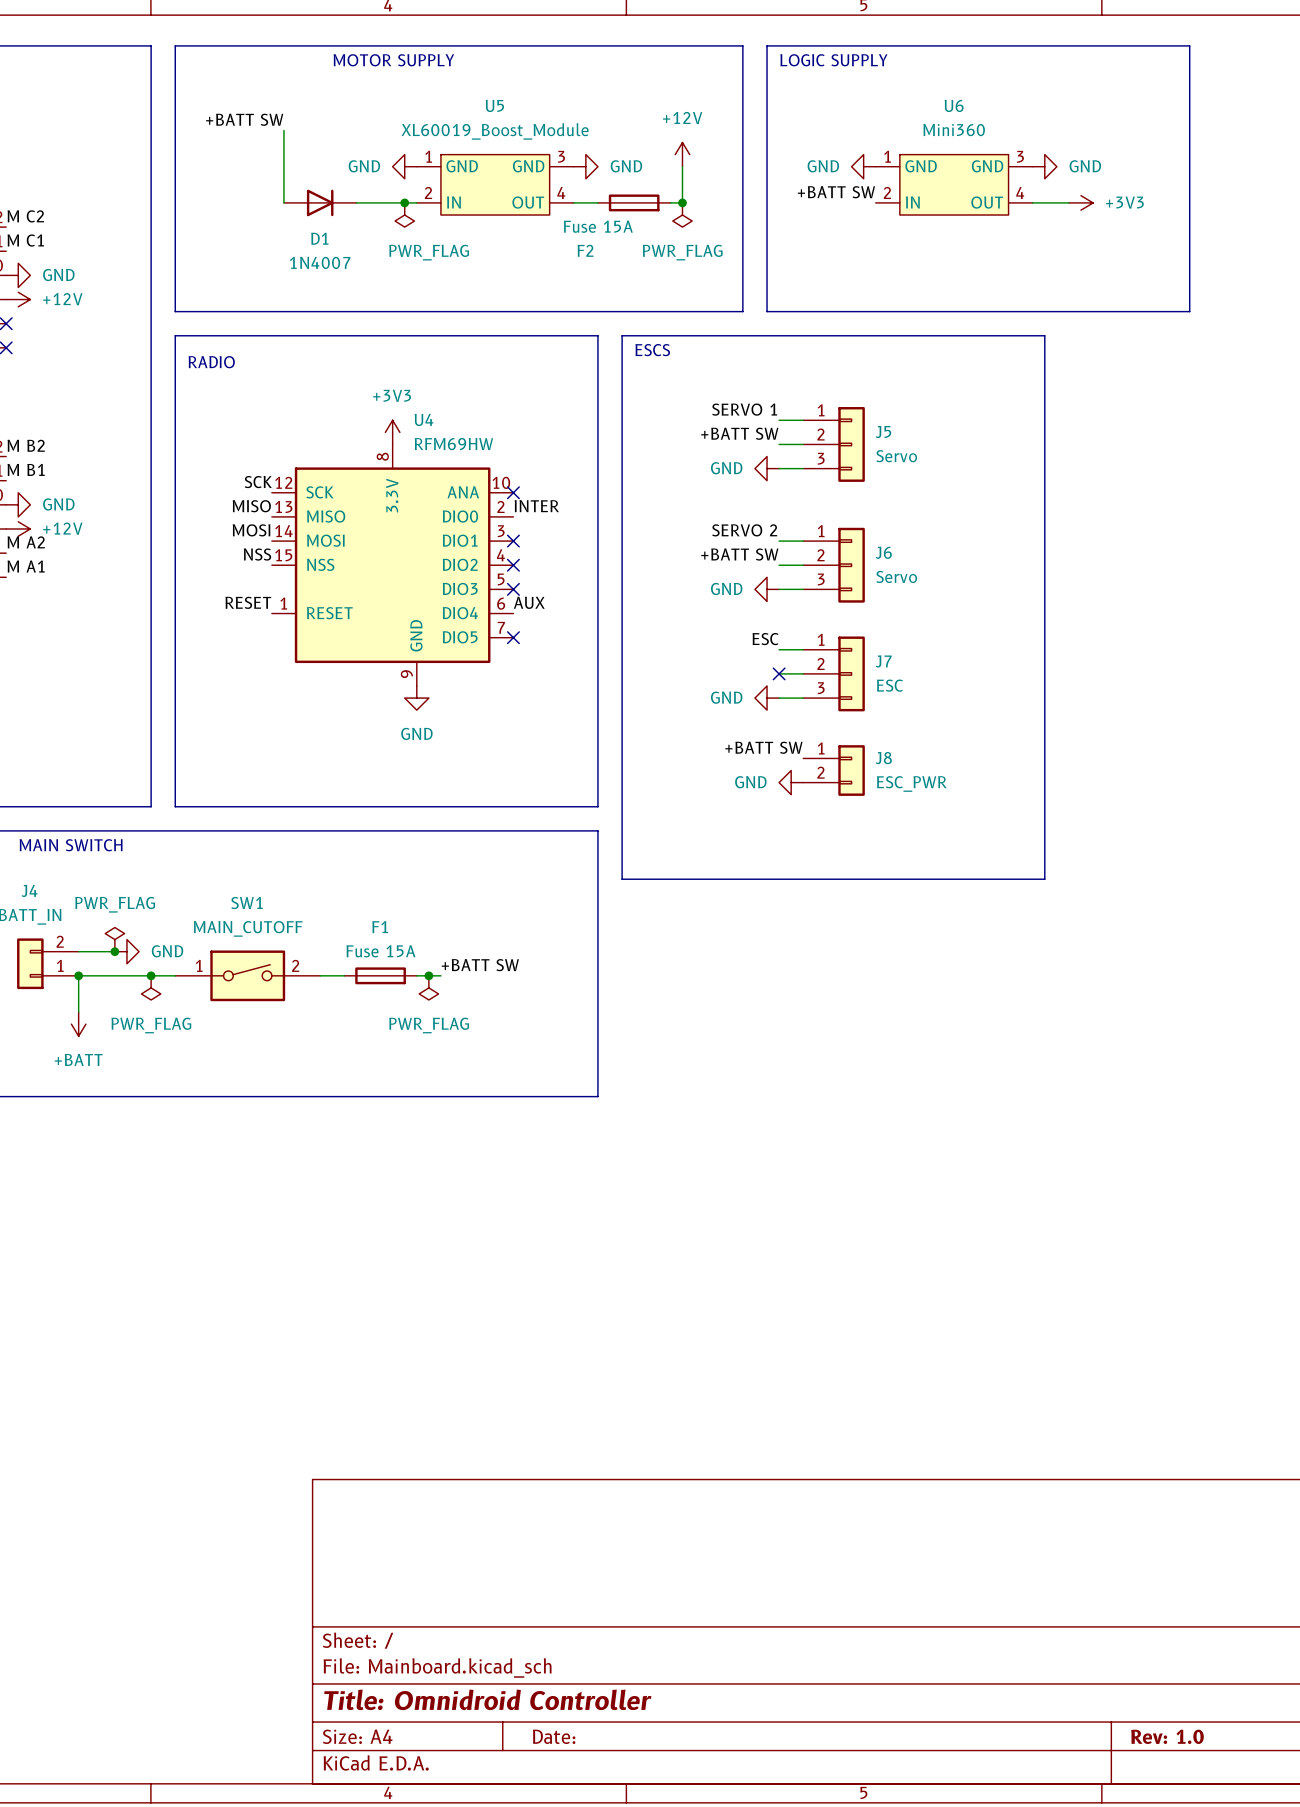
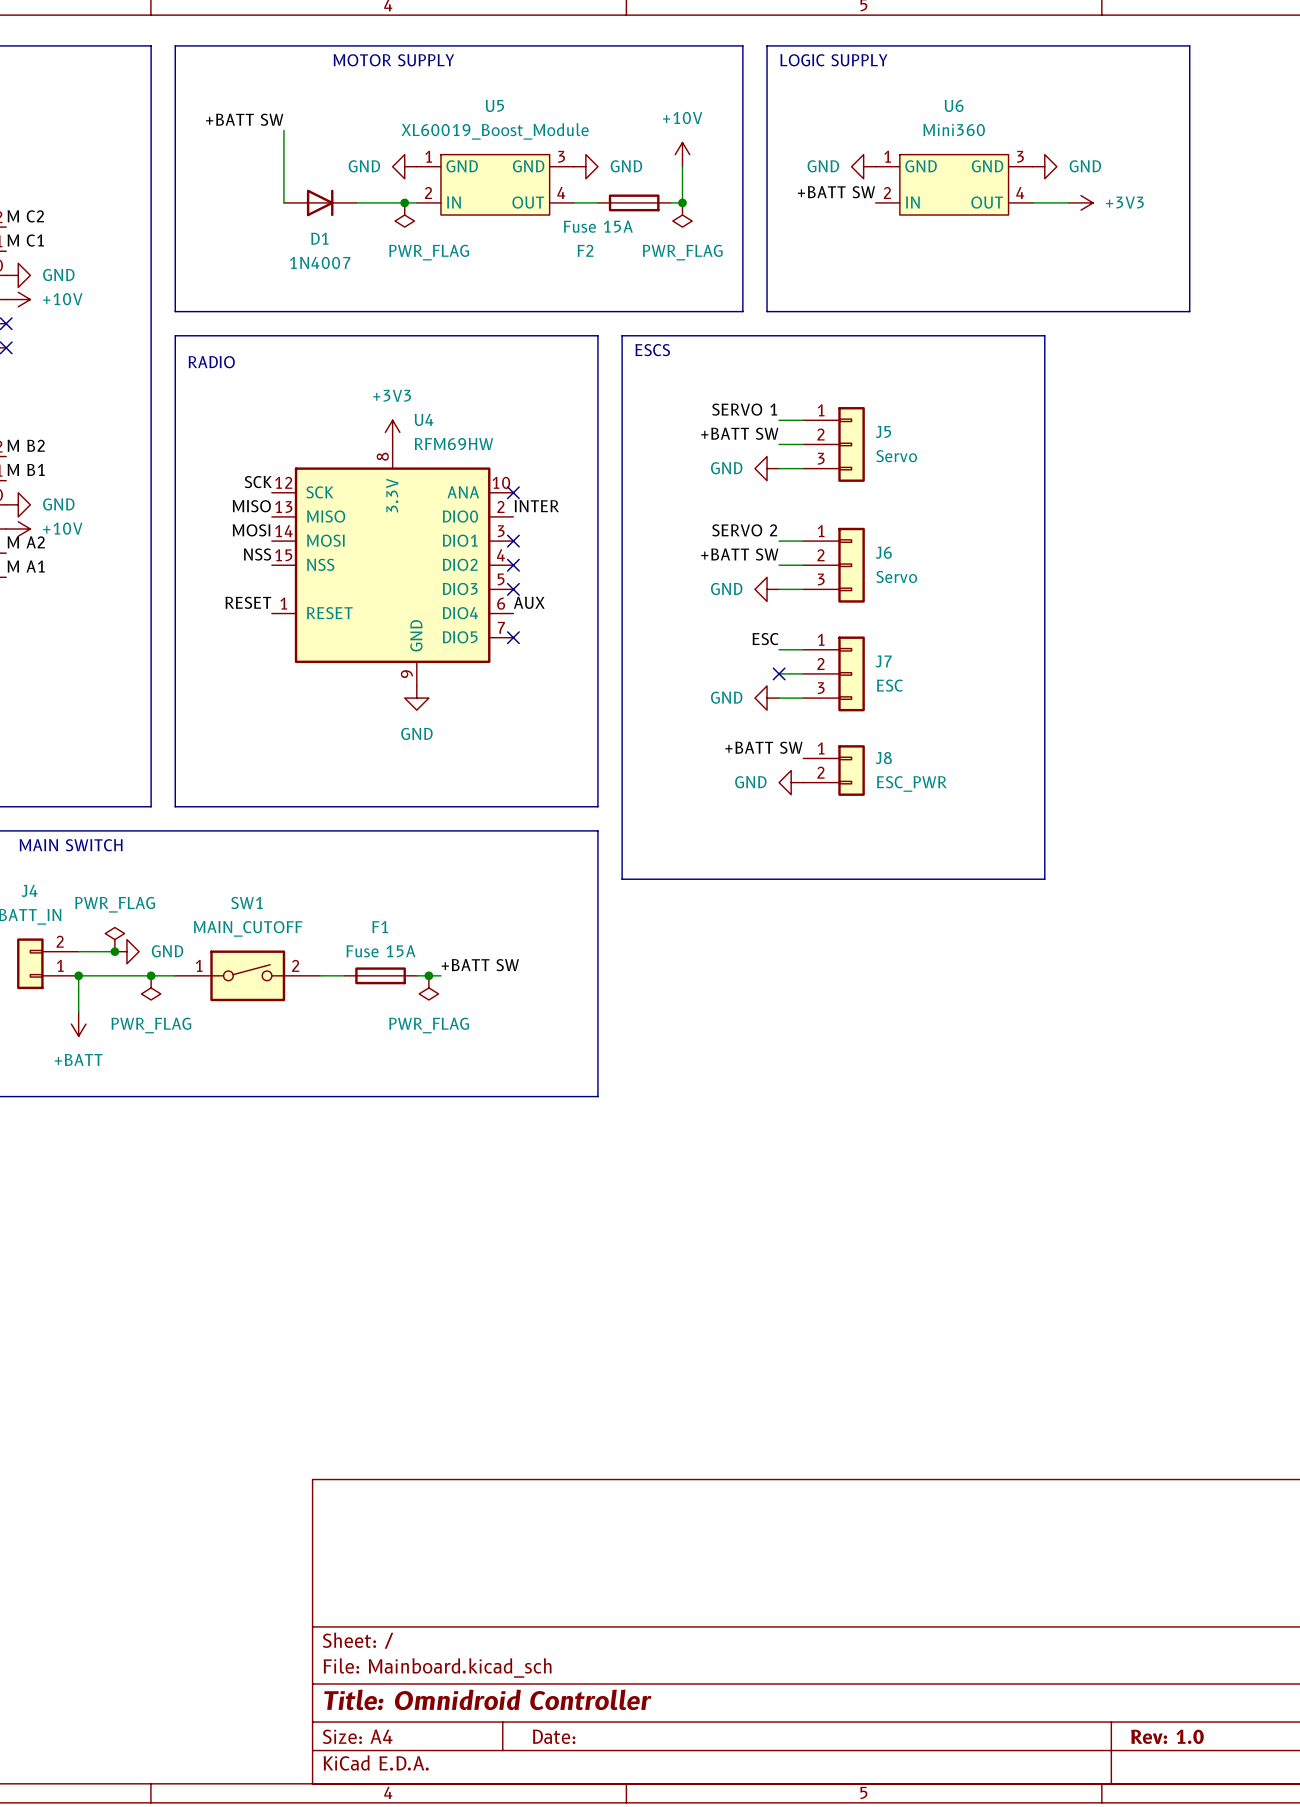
power symbol: +12V (682, 154) -> +10V (682, 154)
power symbol: +12V (18, 299) -> +10V (18, 299)
power symbol: +12V (18, 529) -> +10V (18, 529)

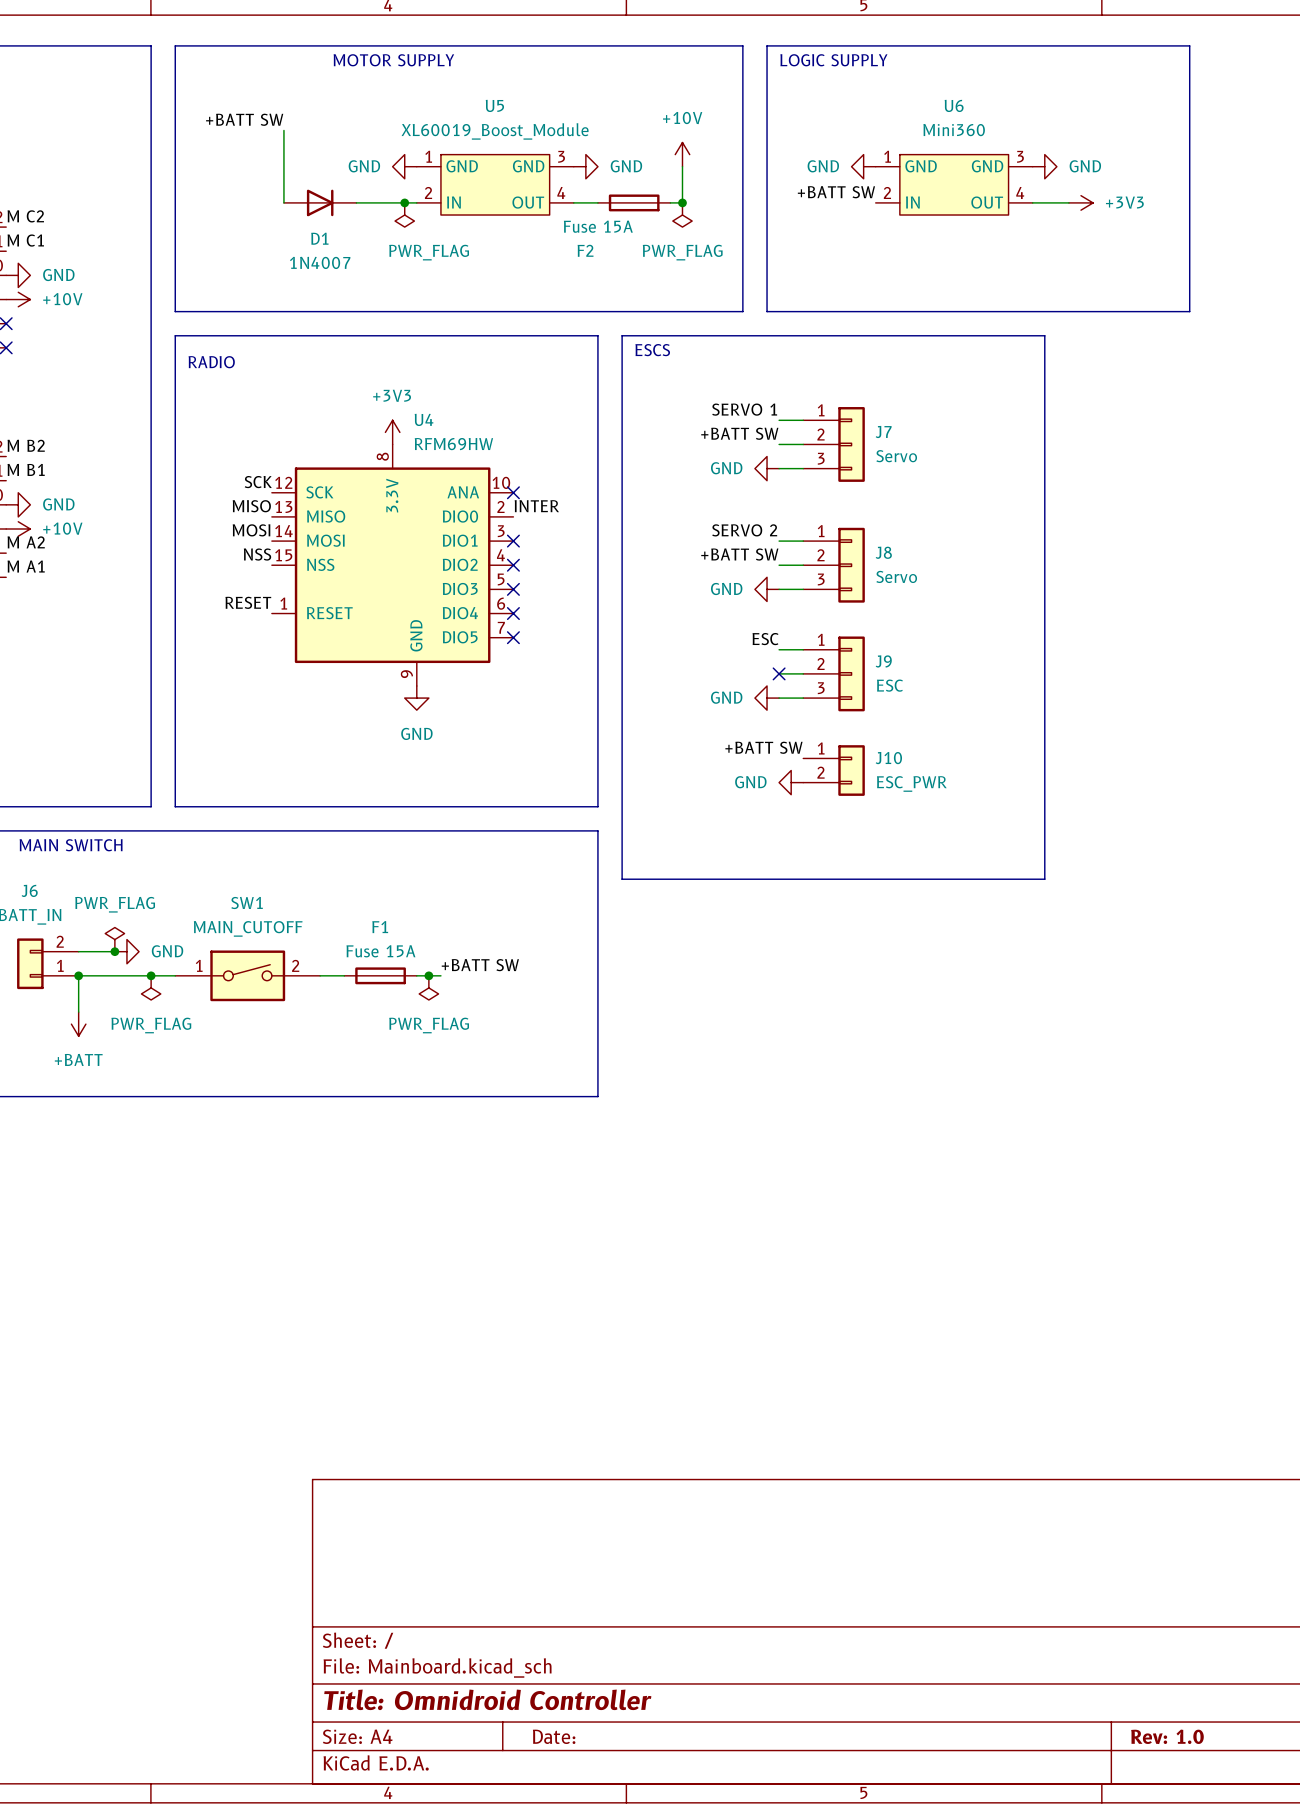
J5 name: J5 (883, 432) -> J7 (883, 432)
J6 name: J6 (883, 552) -> J8 (883, 552)
label: AUX (529, 602) -> none
no-connect mark: none -> (513, 613)
J7 name: J7 (883, 661) -> J9 (883, 661)
J8 name: J8 (883, 758) -> J10 (888, 758)
J4 name: J4 (29, 890) -> J6 (29, 890)

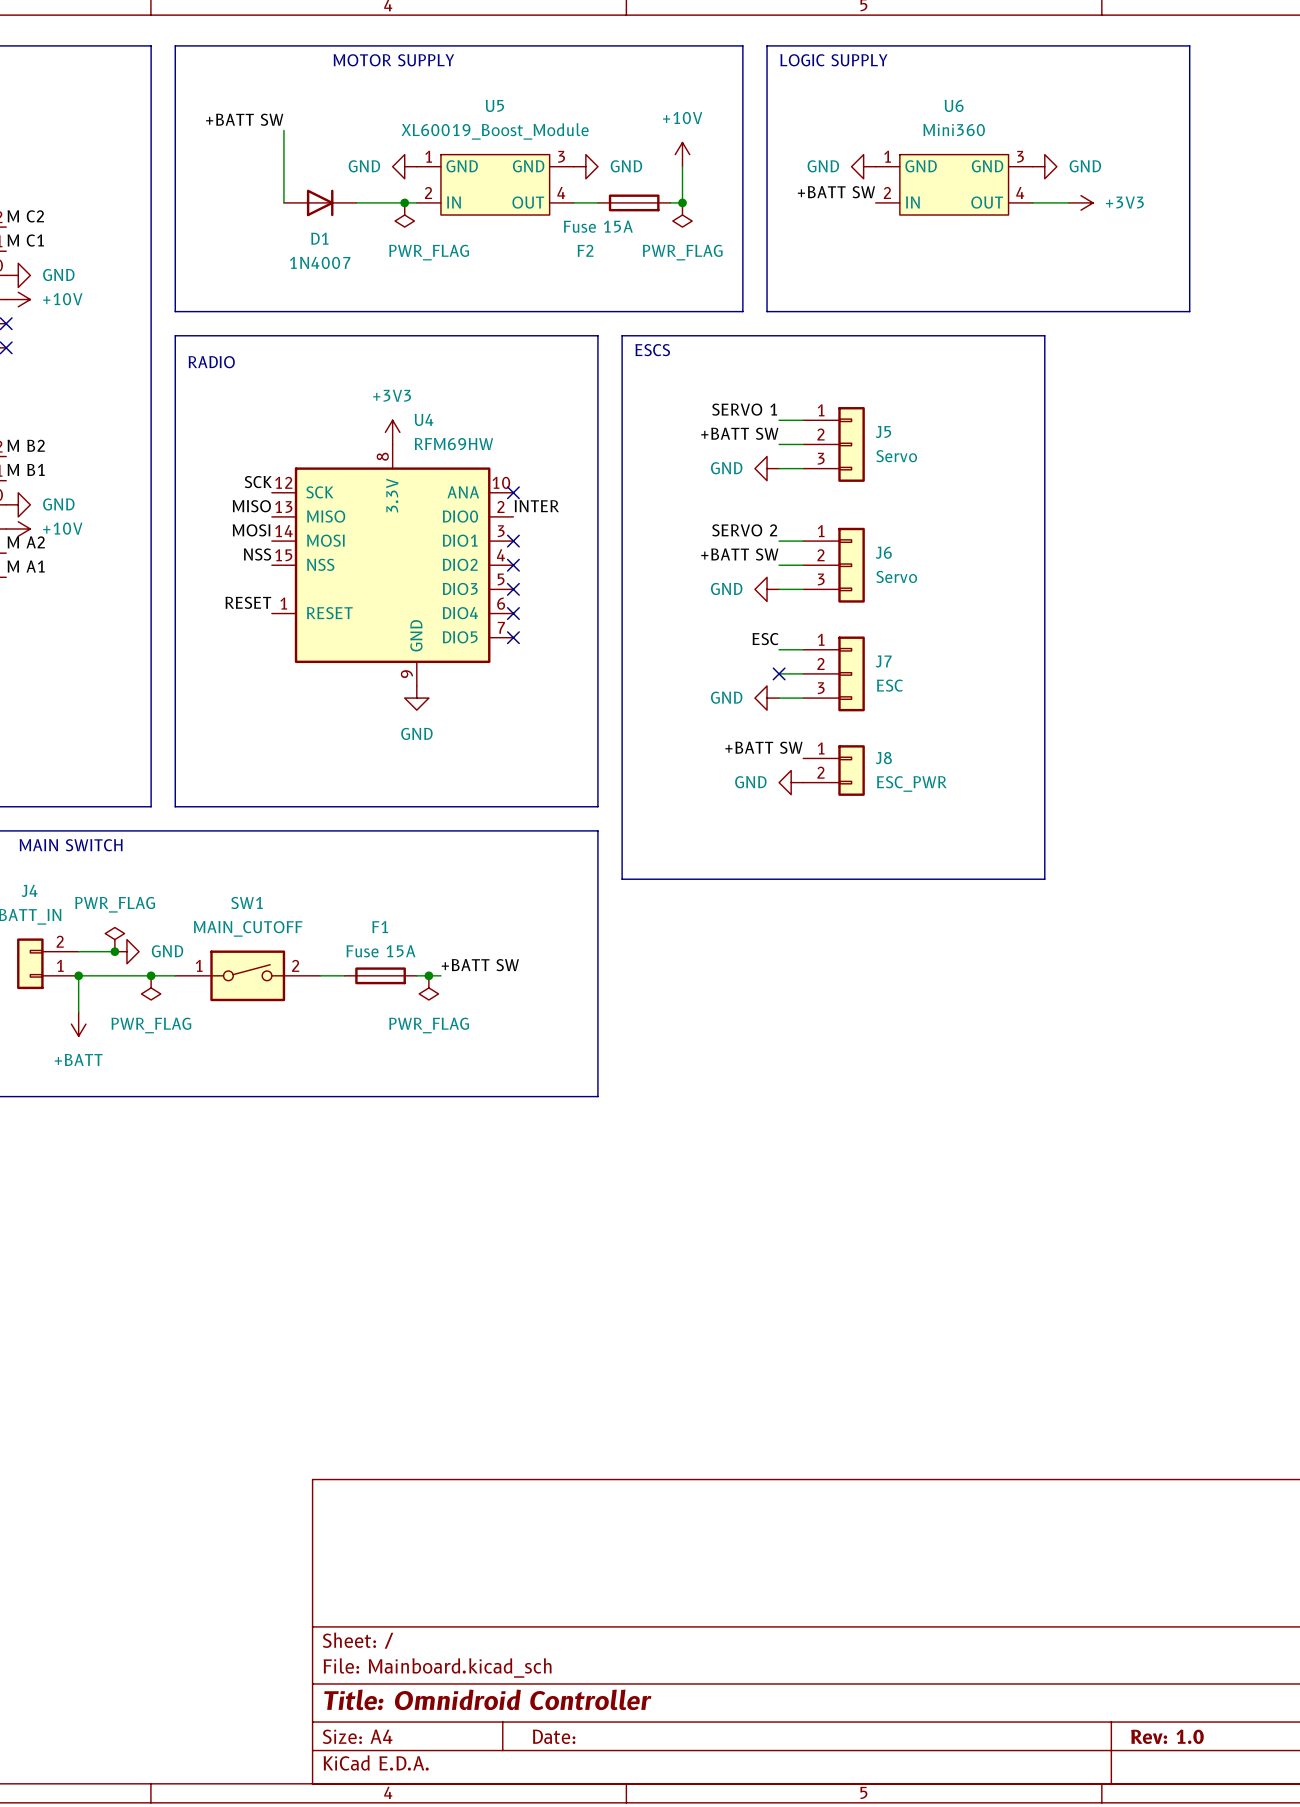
J7 name: J7 (883, 432) -> J5 (883, 432)
J8 name: J8 (883, 552) -> J6 (883, 552)
J9 name: J9 (883, 661) -> J7 (883, 661)
J10 name: J10 (888, 758) -> J8 (883, 758)
J6 name: J6 (29, 890) -> J4 (29, 890)

